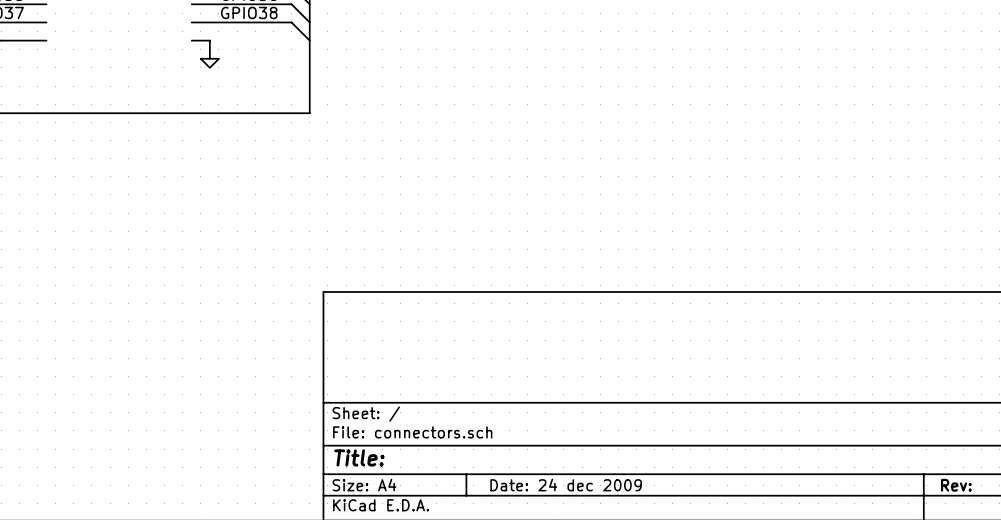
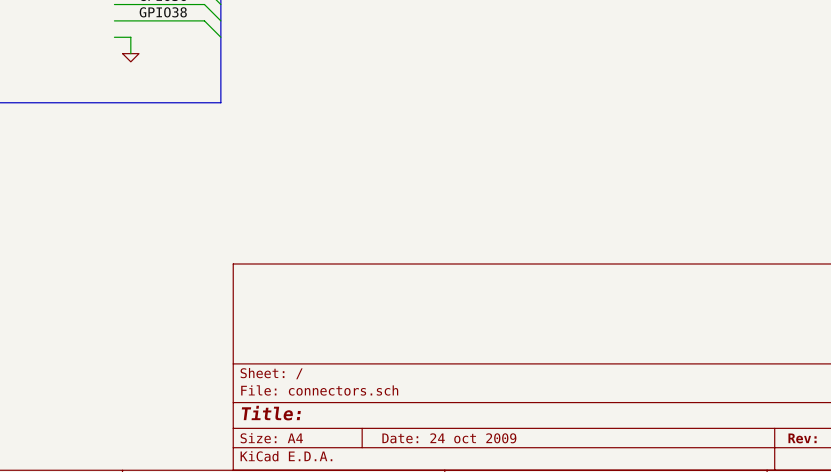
title block: Date: 24 dec 2009 (566, 485) -> Date: 24 oct 2009 (449, 438)

